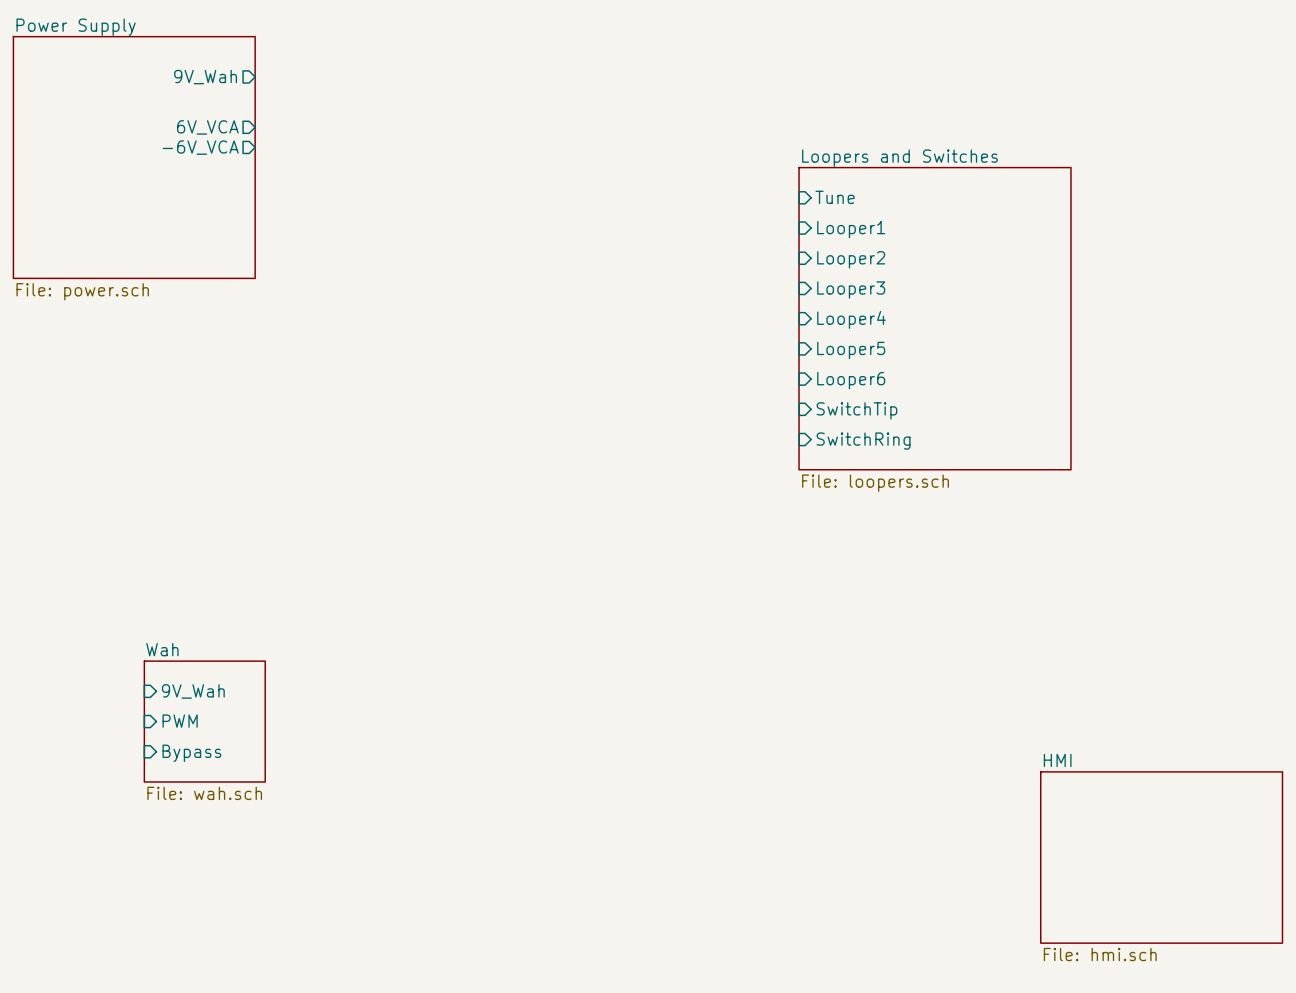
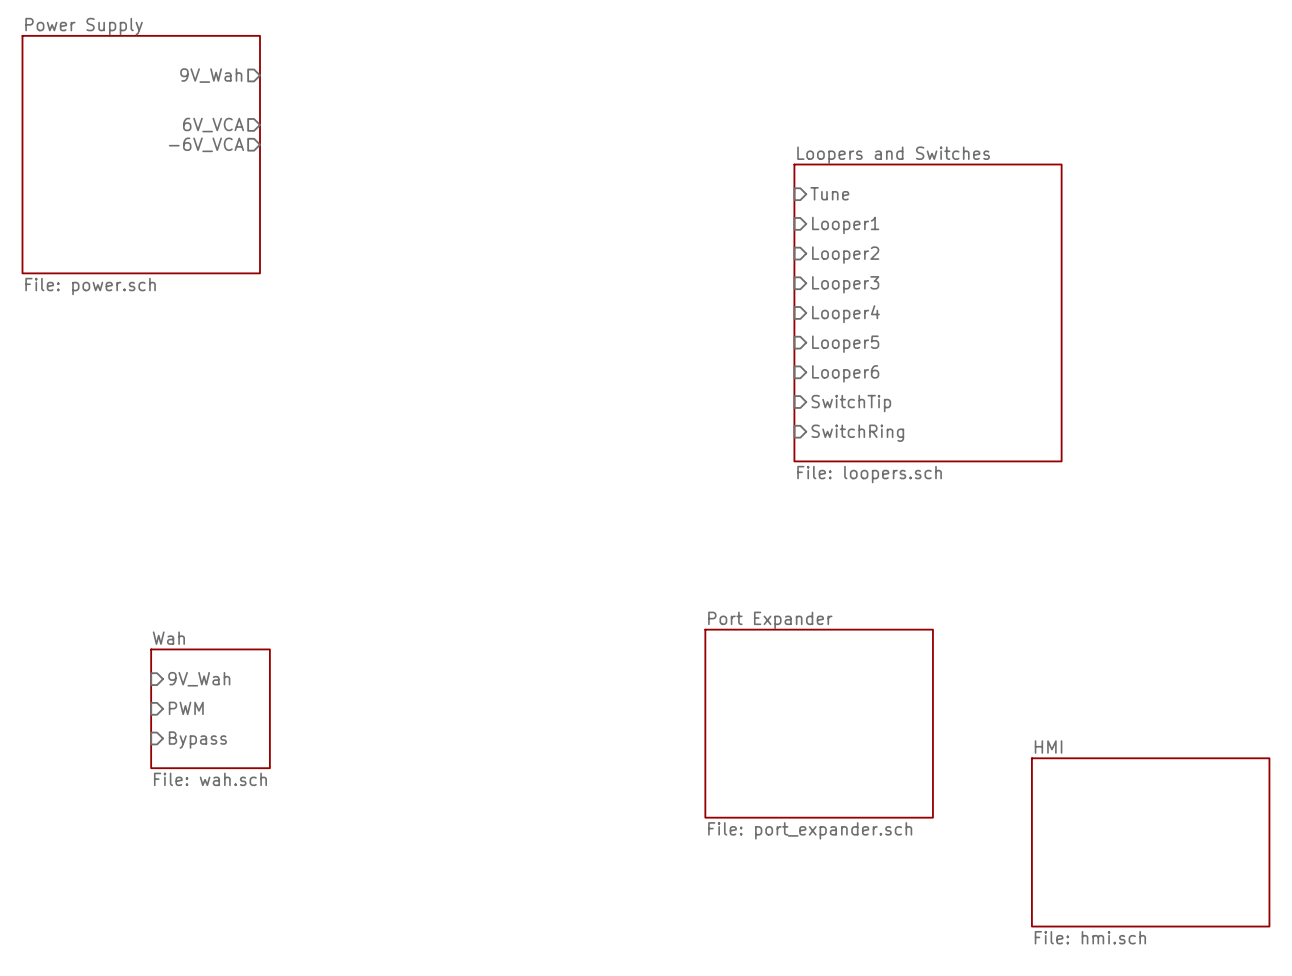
sheet Port Expander: none -> File: port_expander.sch (819, 723)

